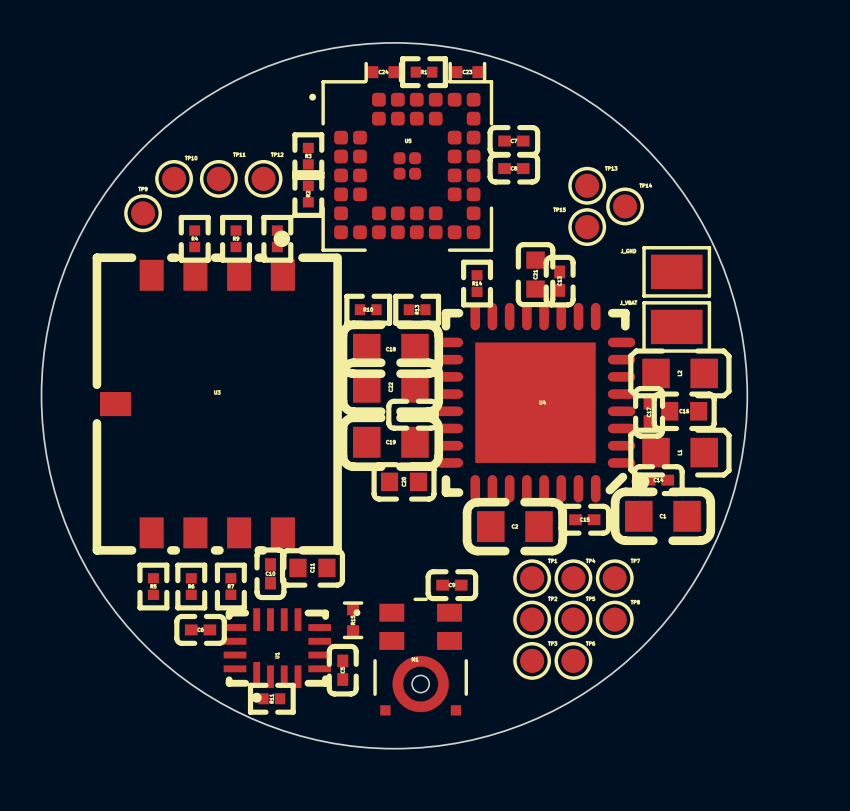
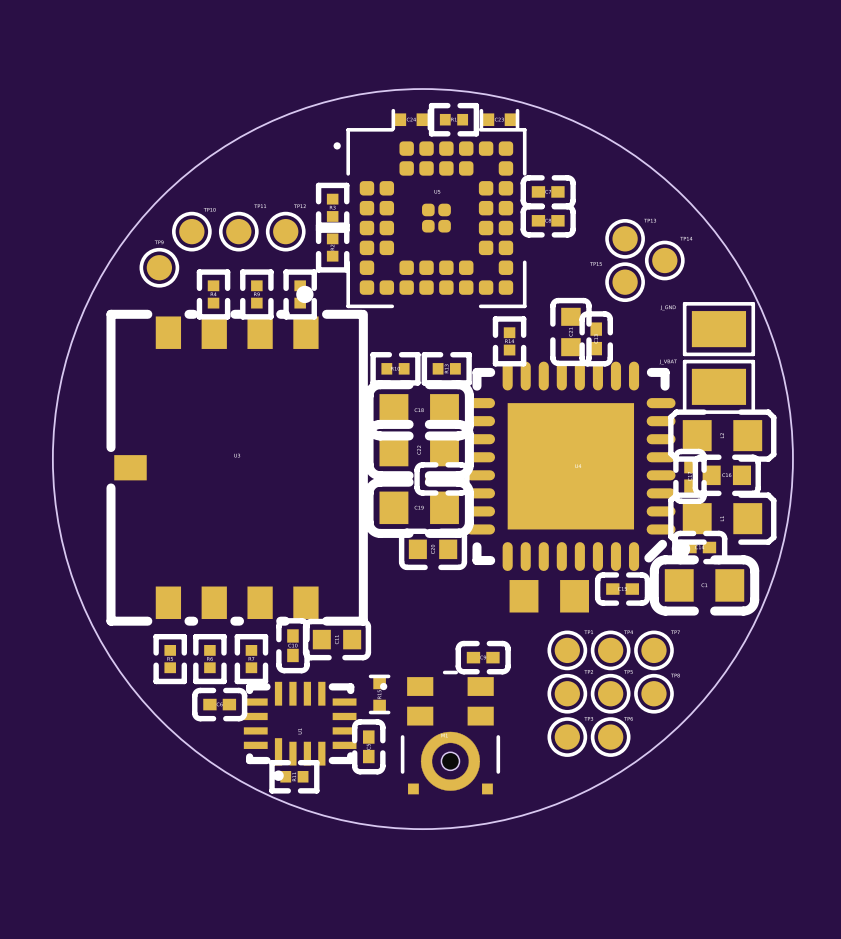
part: (514, 526) -> none

